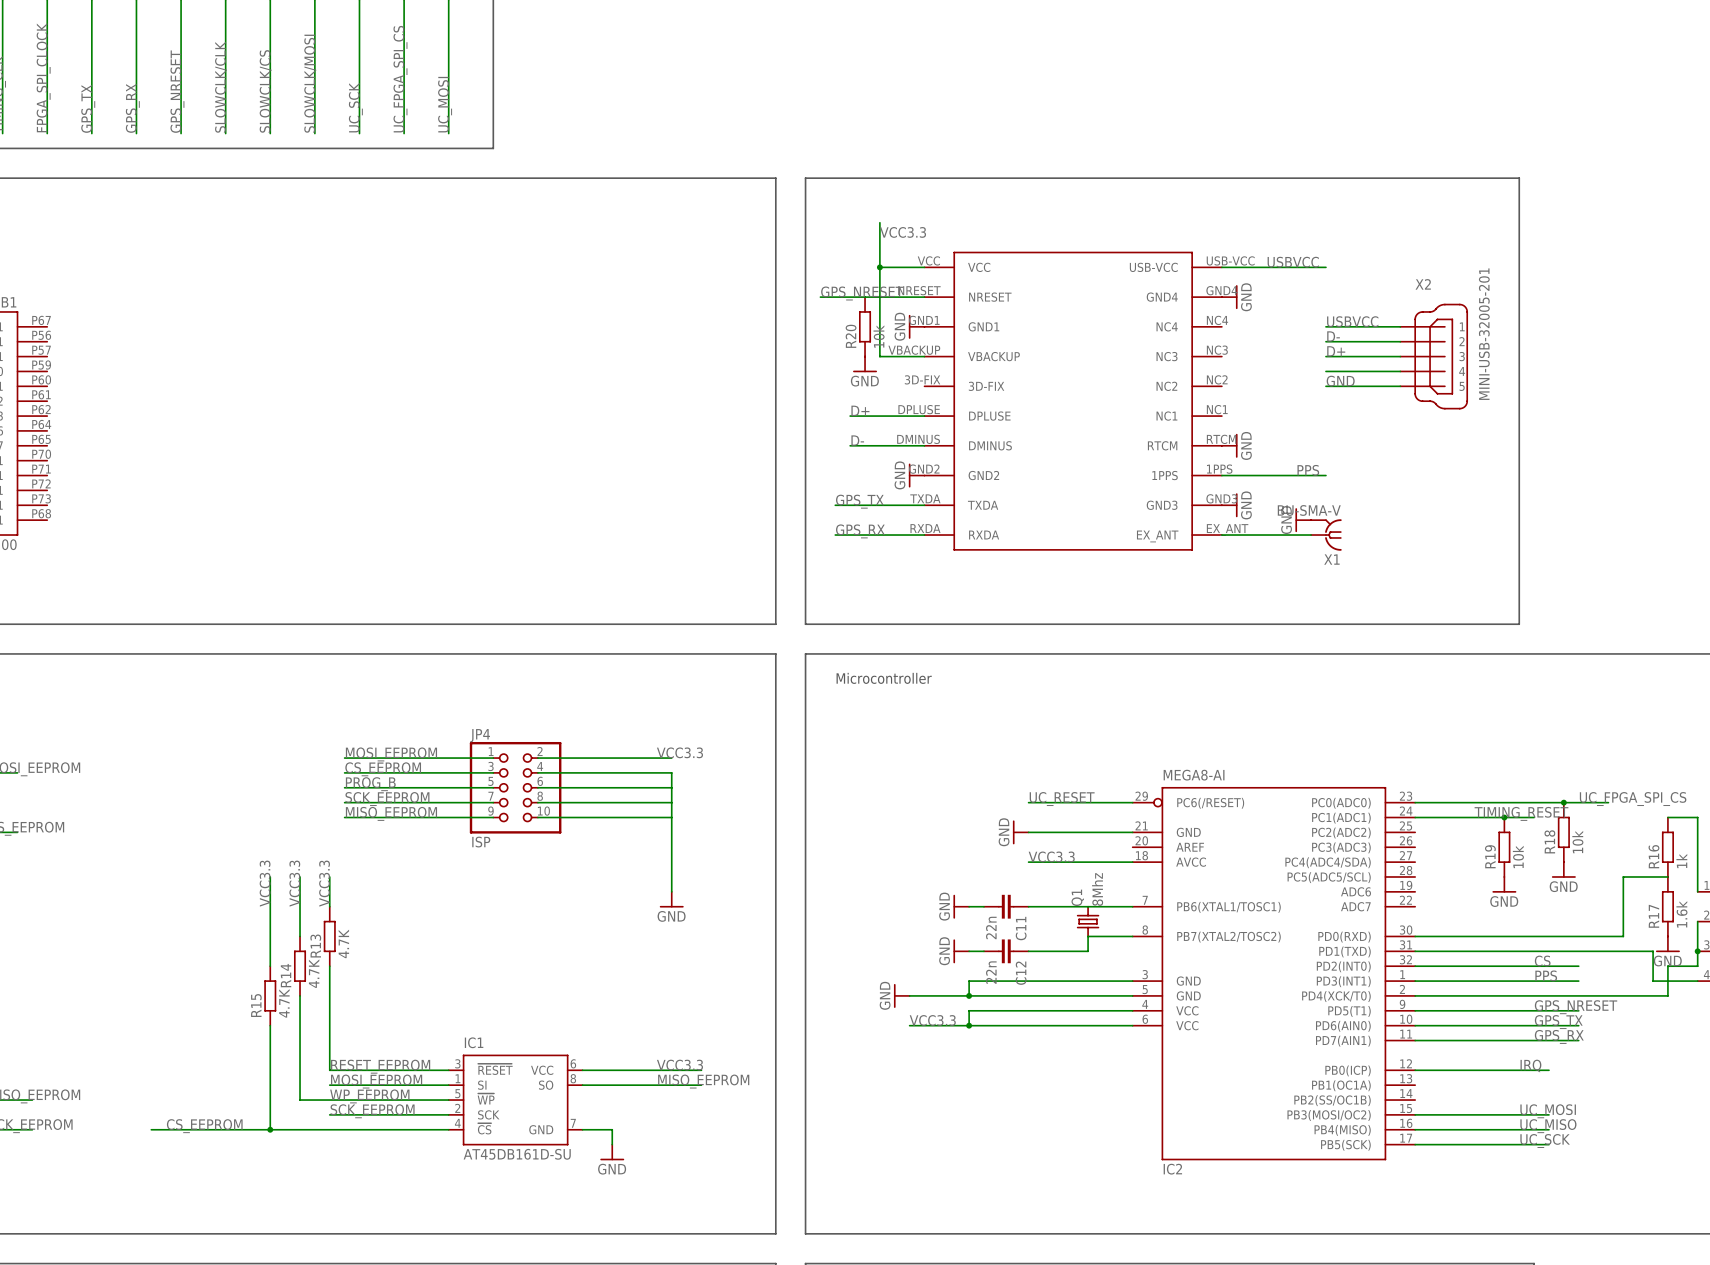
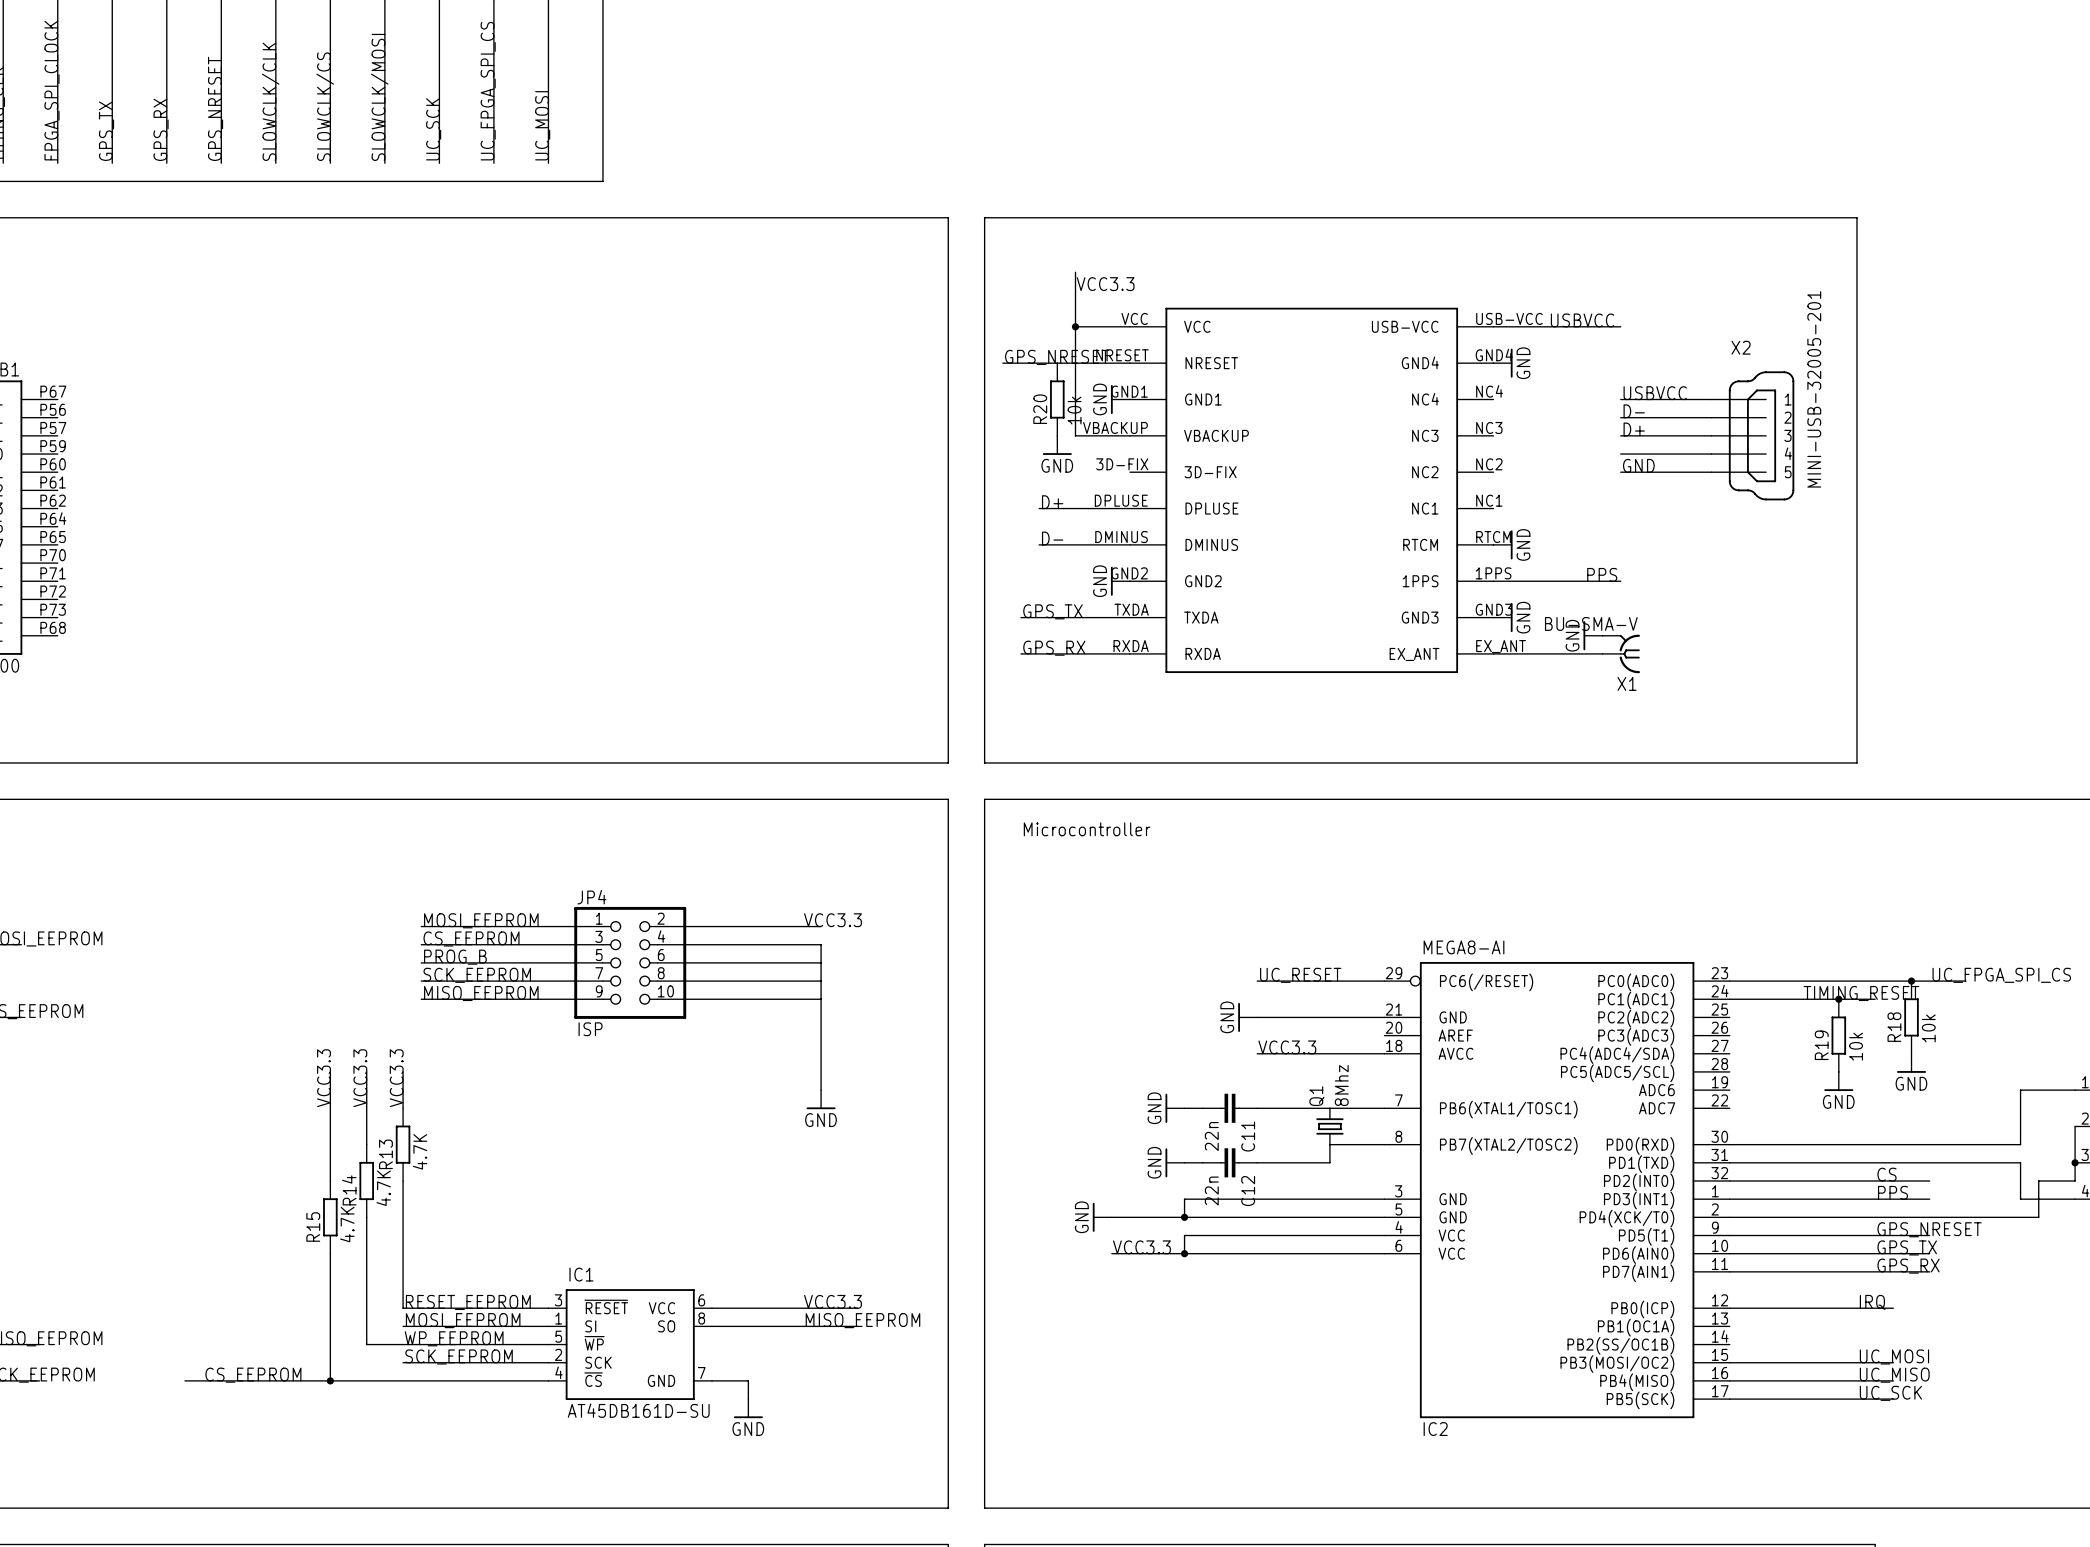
wire: (1667, 817) (1697, 817) (1697, 891) -> none
R16: 1k (1667, 847) -> none
wire: (1667, 876) (1623, 876) (1623, 936) -> (2075, 1090) (2020, 1090) (2020, 1144) (1984, 1144)
R17: 1.6k (1667, 906) -> none
power symbol: GND (1667, 944) -> none

